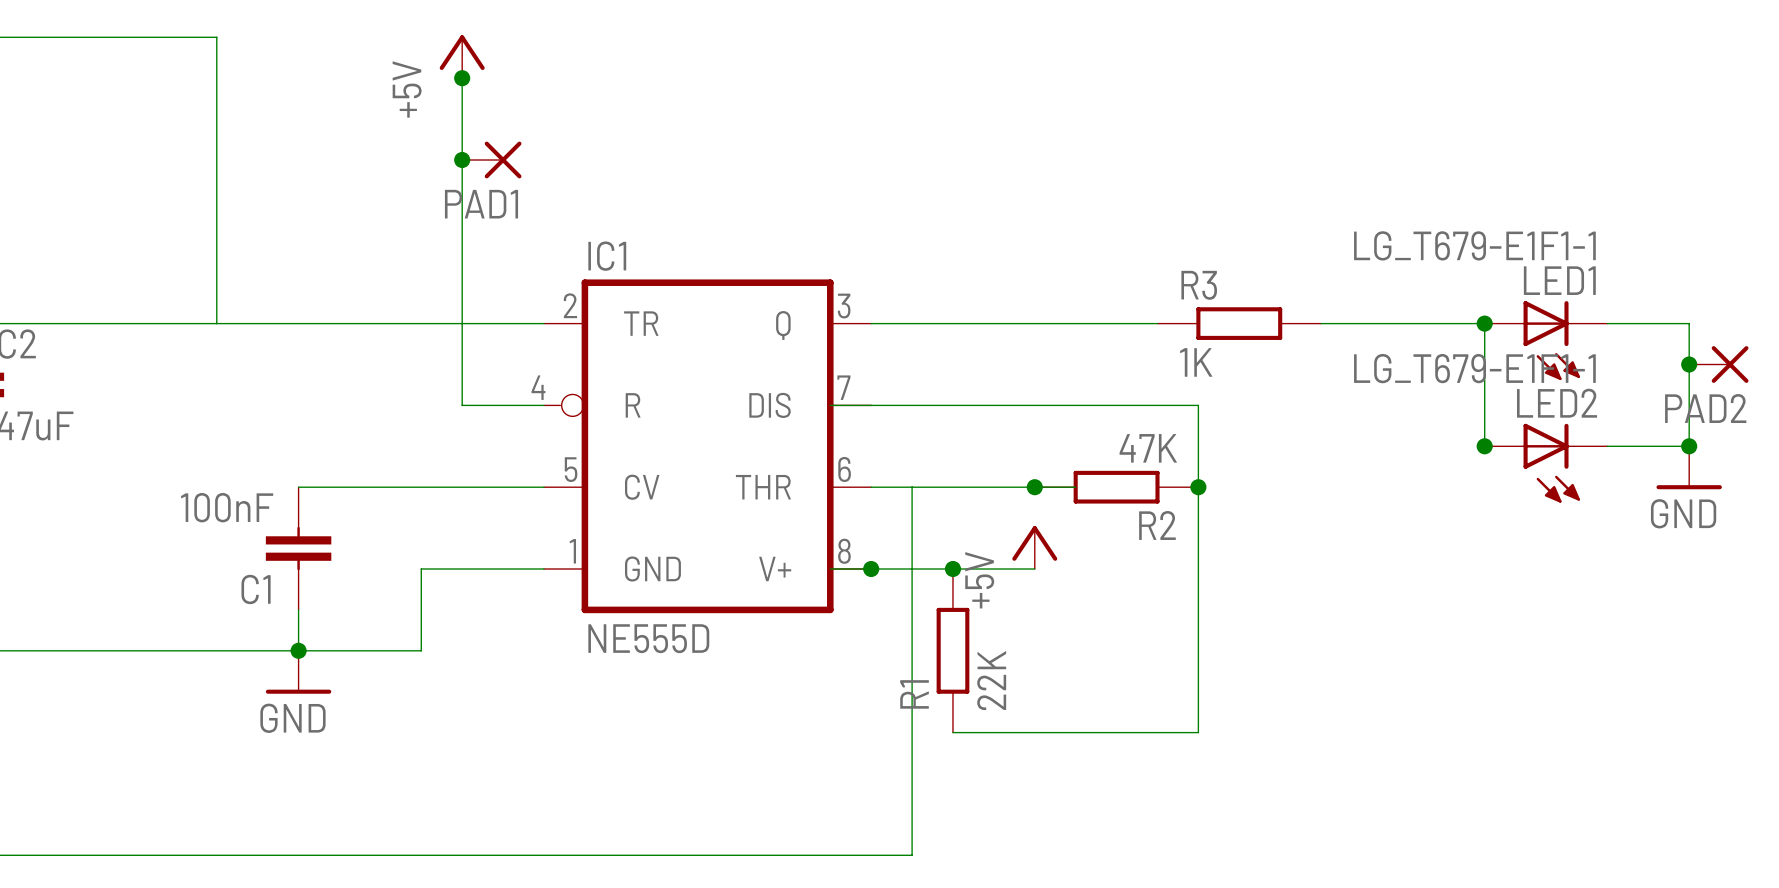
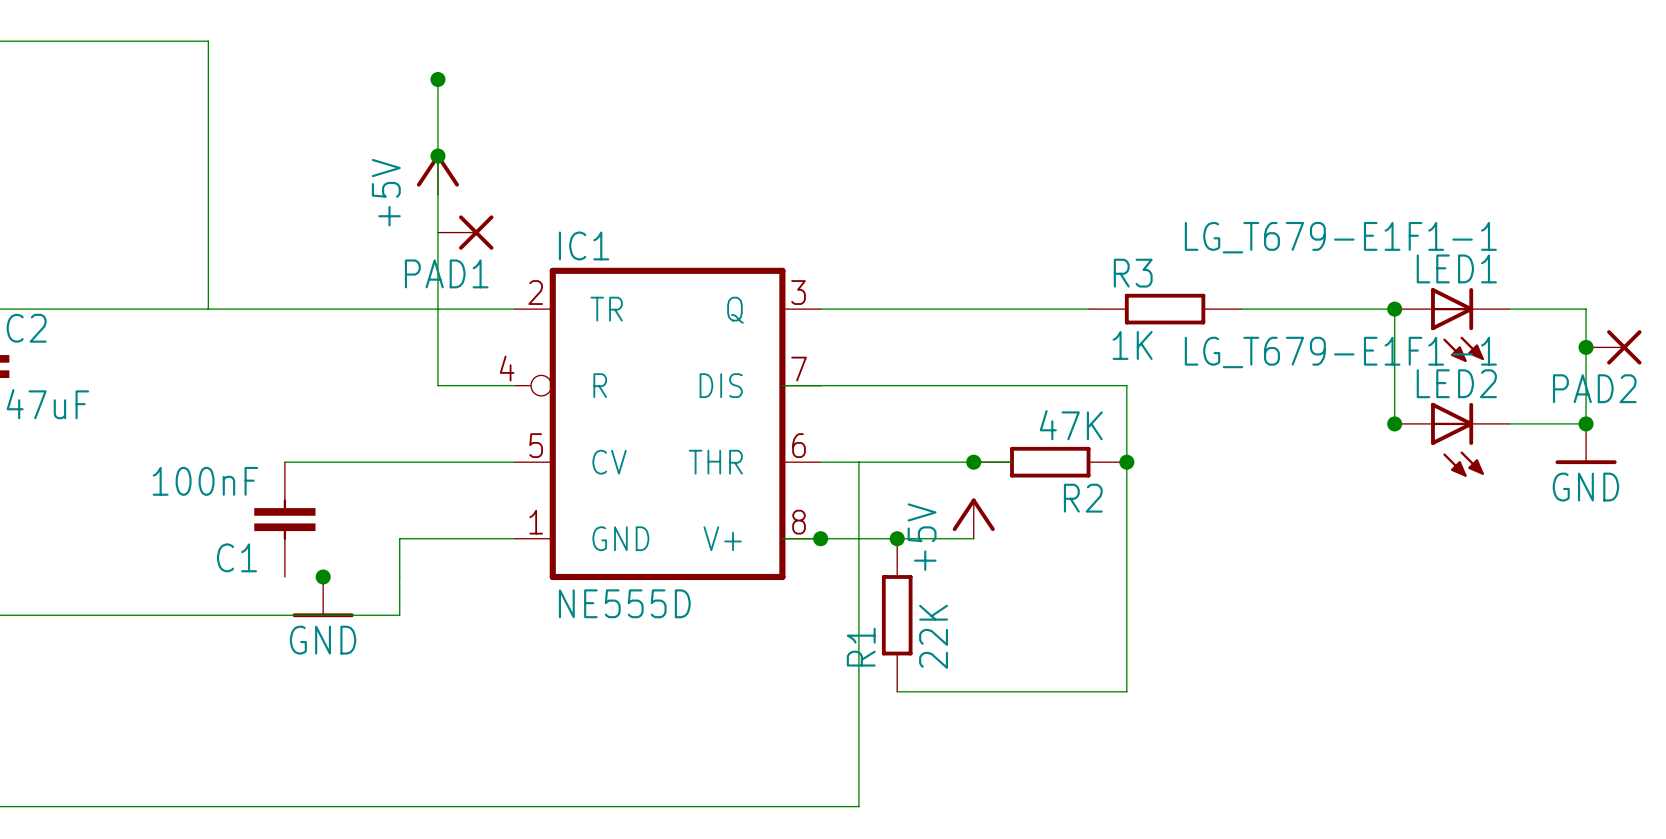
power symbol position: +5V (462, 56) -> +5V (437, 174)
PAD1 position: (491, 160) -> (465, 232)
wire: (298, 609) (298, 650) -> none
junction position: (298, 650) -> (323, 576)
power symbol position: GND (298, 672) -> GND (323, 597)

